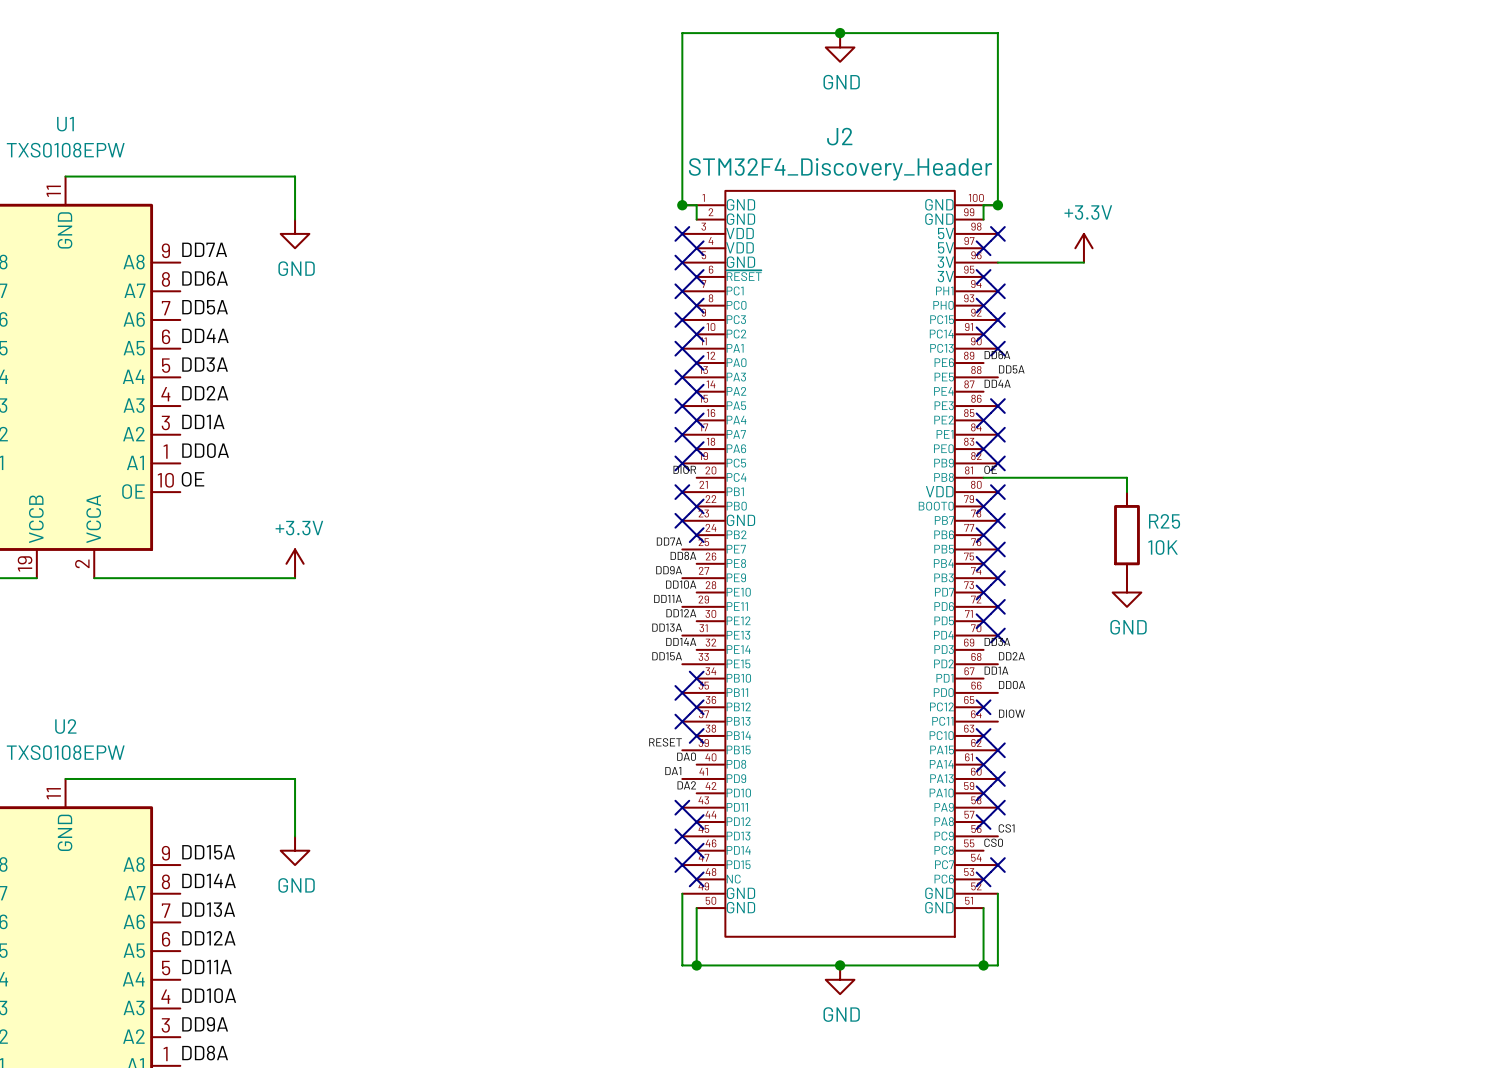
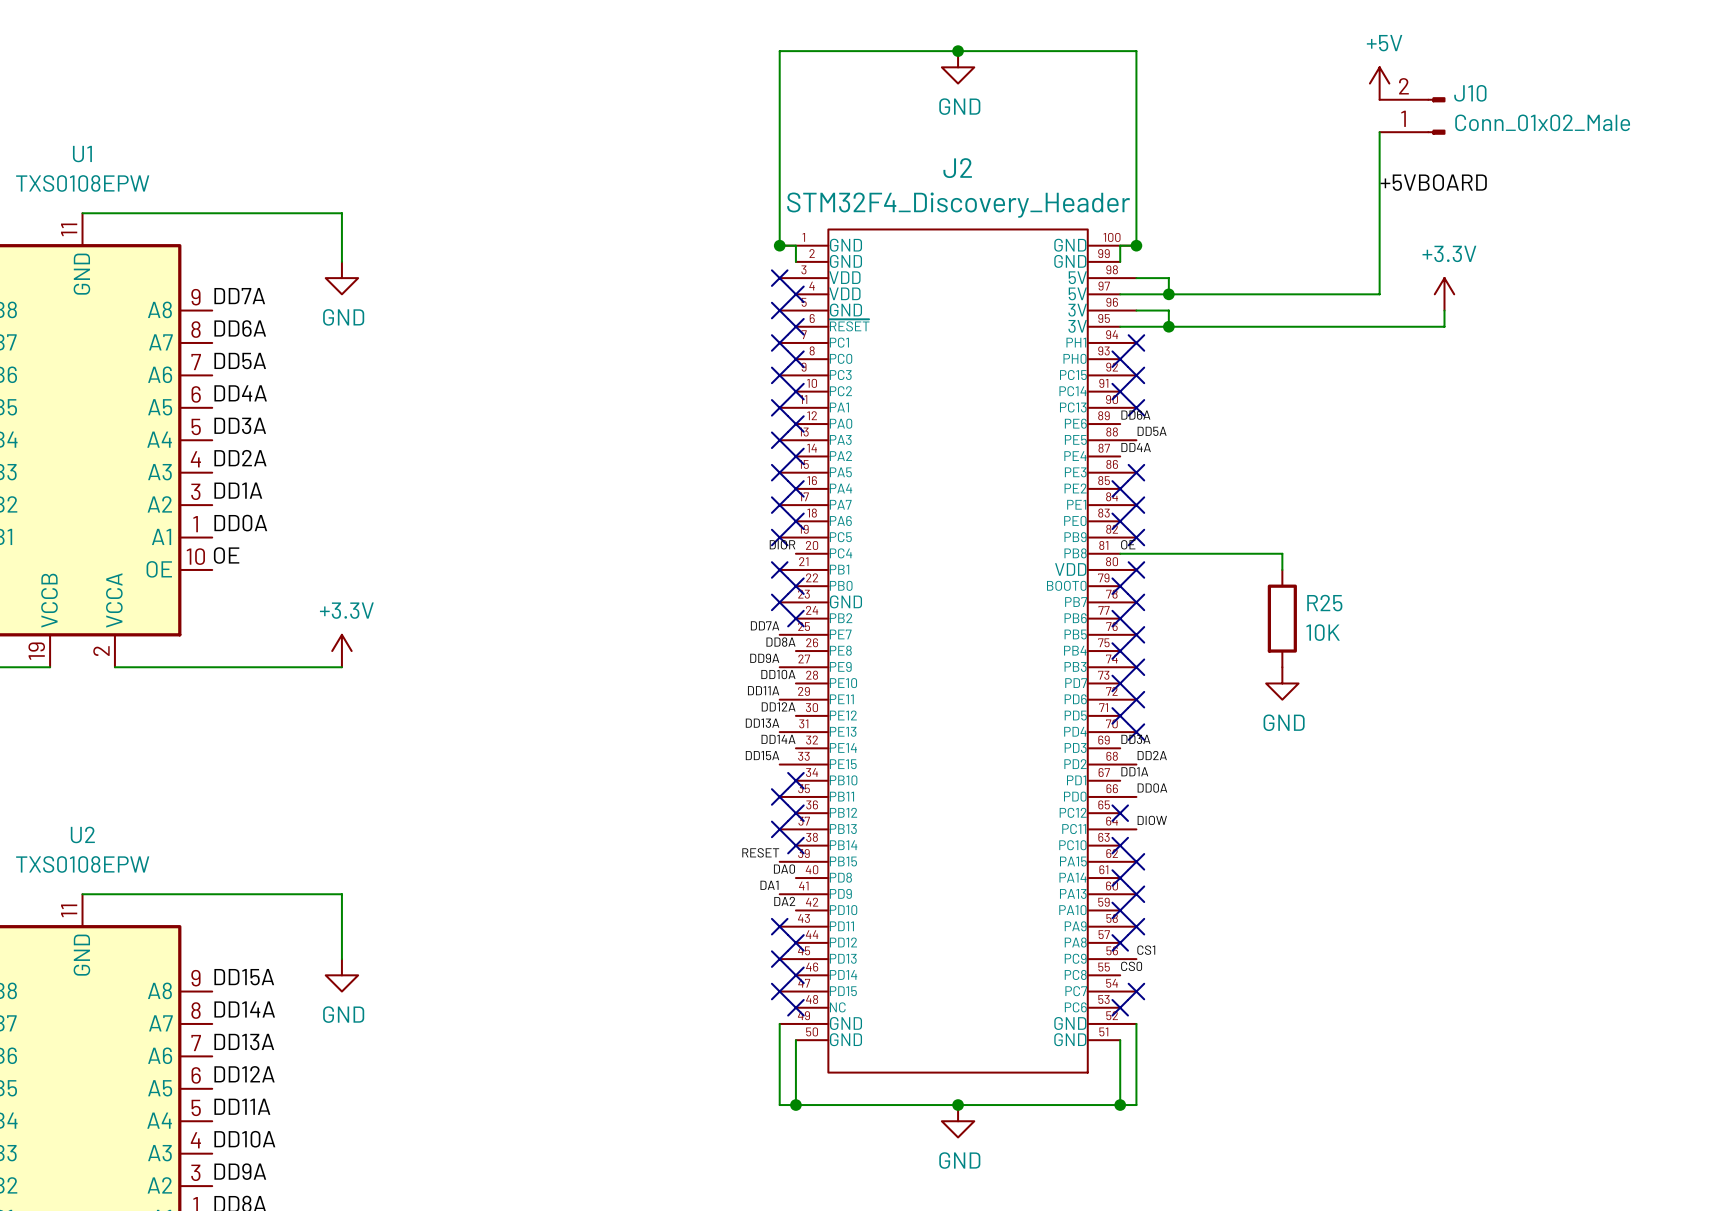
power symbol: none -> +5V (1379, 83)
J10: none -> Conn_01x02_Male (1412, 115)
wire: none -> (1379, 132) (1379, 294) (1120, 294)
label: none -> +5VBOARD (1433, 182)
wire: none -> (1136, 278) (1168, 278) (1168, 294)
no-connect mark: (997, 233) -> none
no-connect mark: (983, 248) -> none
junction: none -> (1168, 294)
power symbol position: +3.3V (1083, 248) -> +3.3V (1444, 294)
wire: (1026, 262) (1083, 262) -> (1168, 310) (1168, 326)
wire: none -> (1444, 310) (1444, 326) (1120, 326)
no-connect mark: (983, 276) -> none
junction: none -> (1168, 326)

